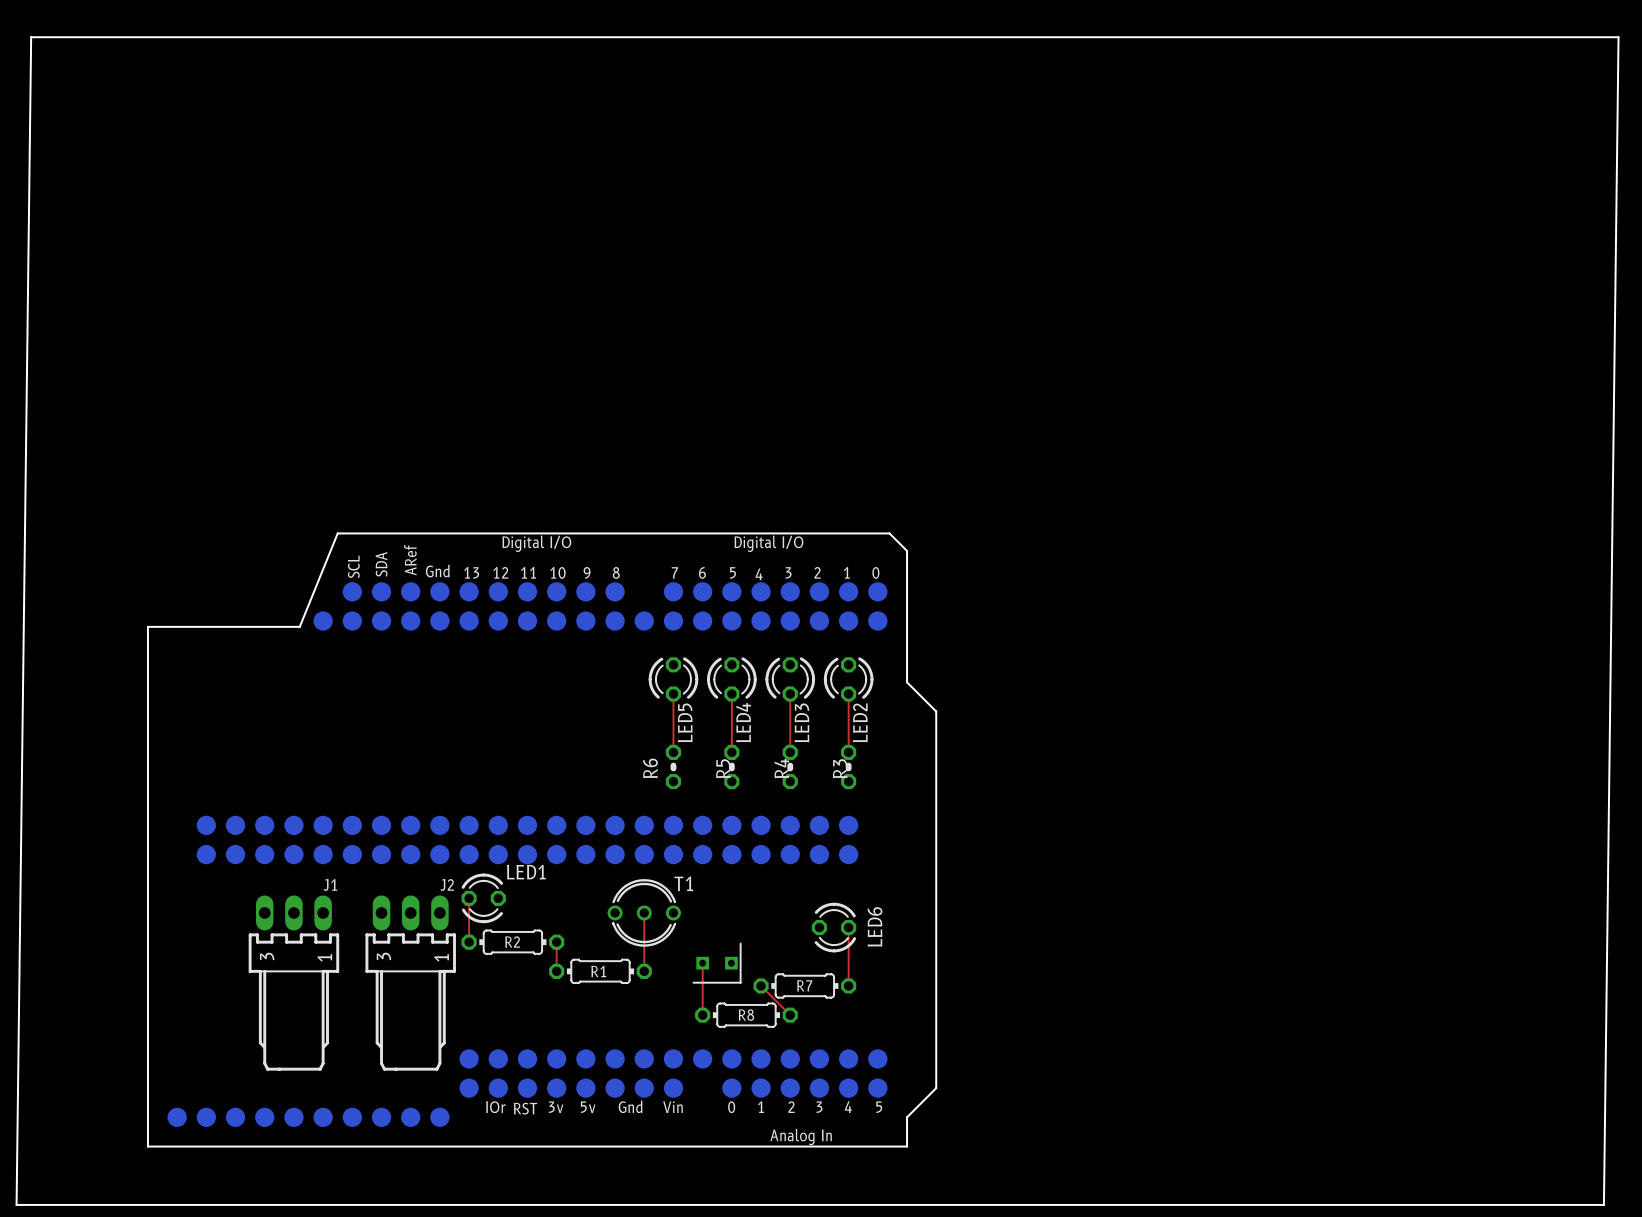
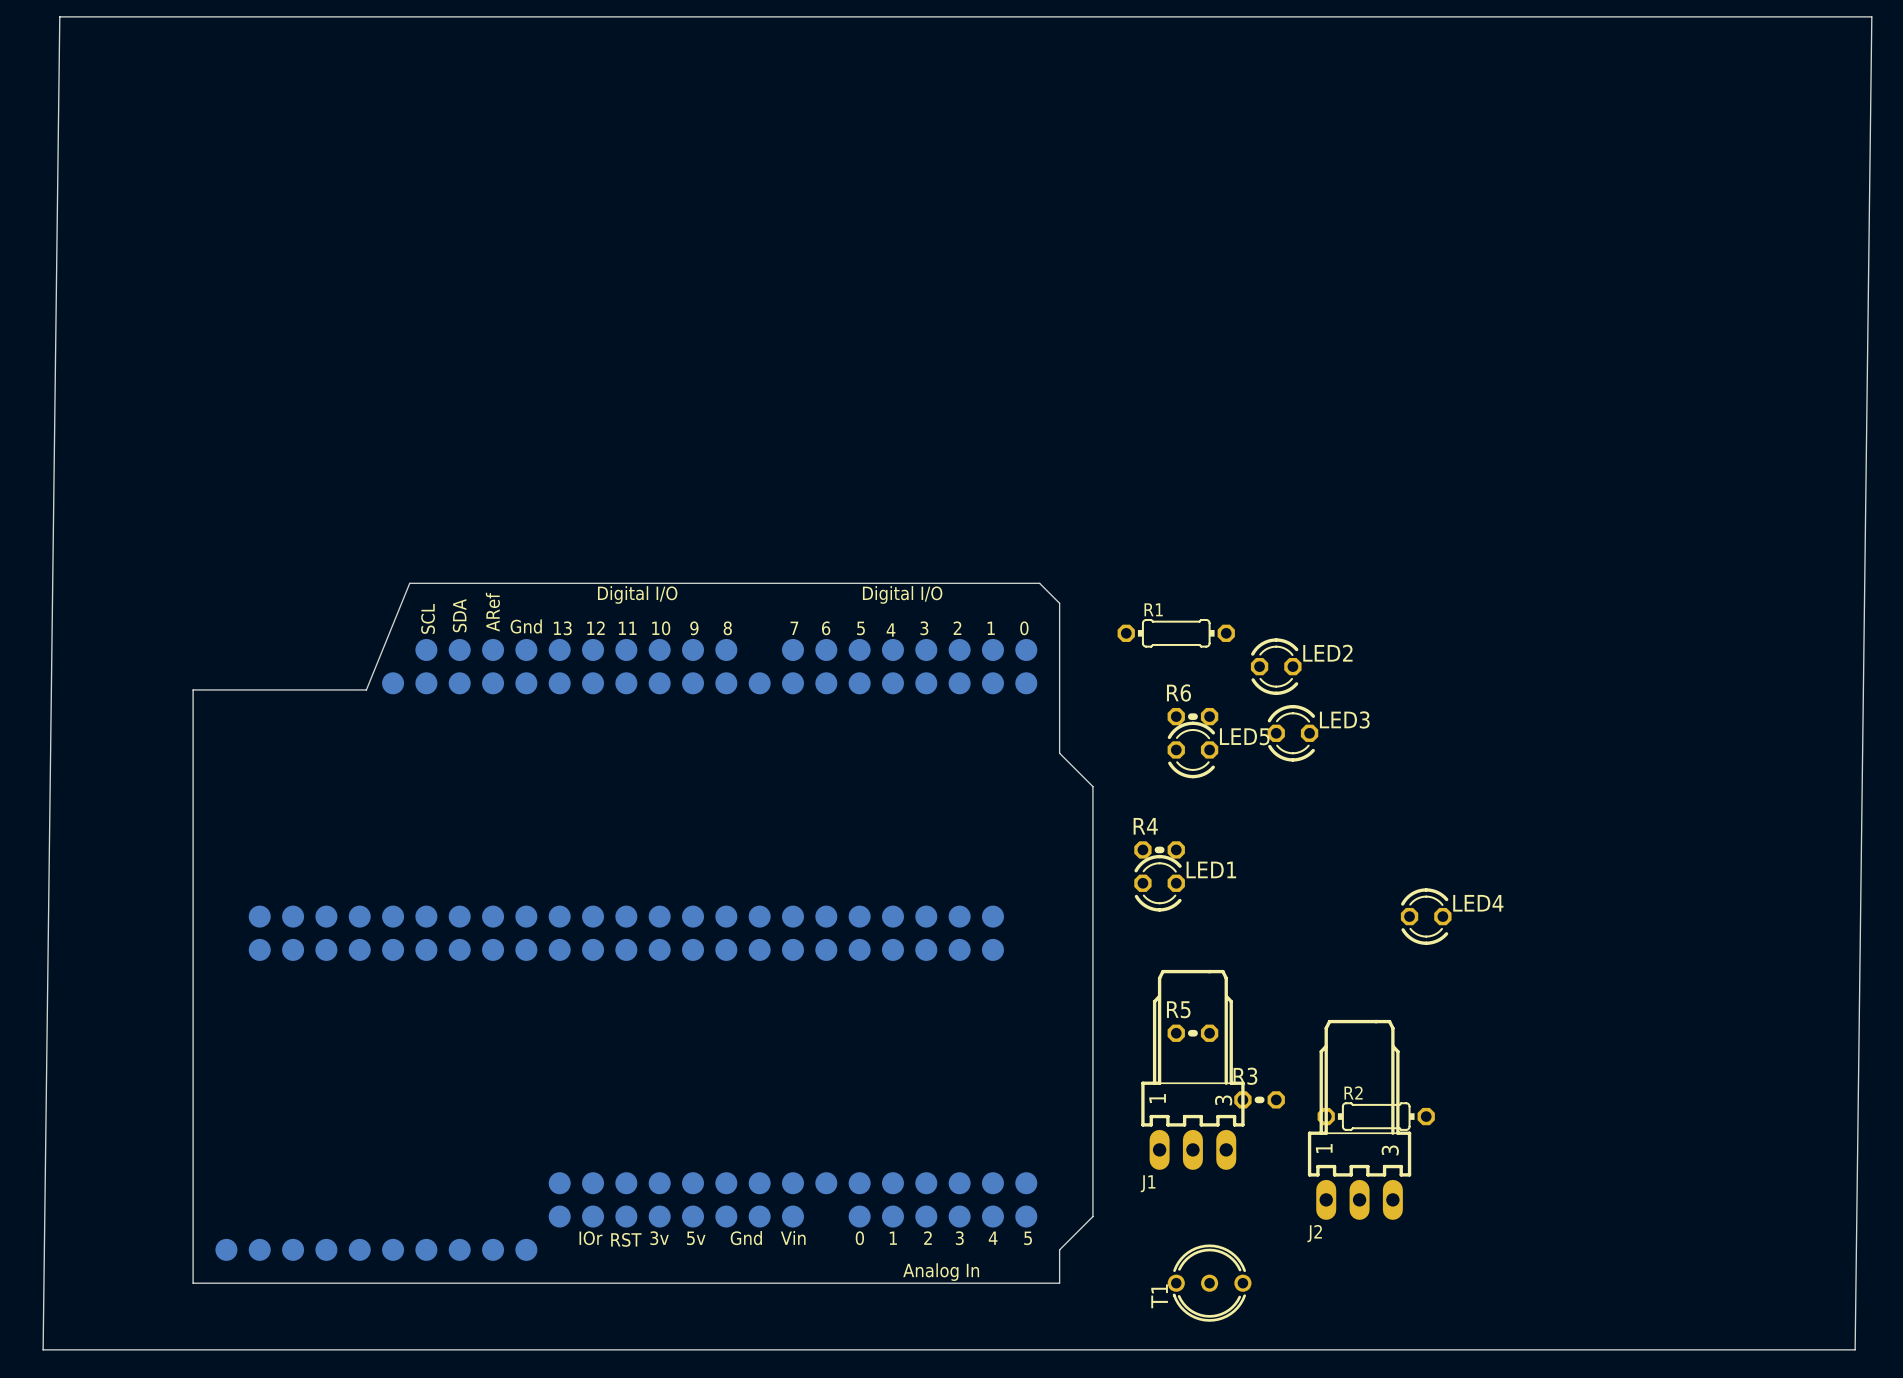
LED5 rotation: 0° (673, 679) -> 90° counterclockwise (1192, 749)
LED5 position: (673, 679) -> (1192, 749)
LED4 rotation: 0° (731, 679) -> 90° counterclockwise (1426, 916)
LED4 position: (731, 679) -> (1426, 916)
LED3 rotation: 0° (790, 679) -> 90° counterclockwise (1292, 733)
LED3 position: (790, 679) -> (1292, 733)
LED2 rotation: 0° (848, 679) -> 90° counterclockwise (1276, 666)
LED2 position: (848, 679) -> (1276, 666)
top track: (673, 694) (673, 752) -> none
top track: (731, 694) (731, 752) -> none
top track: (790, 694) (790, 752) -> none
top track: (848, 694) (848, 752) -> none
R6 rotation: 0° (673, 767) -> 90° clockwise (1192, 716)
R6 position: (673, 767) -> (1192, 716)
R5 rotation: 0° (731, 767) -> 90° clockwise (1192, 1033)
R5 position: (731, 767) -> (1192, 1033)
R4 rotation: 0° (790, 767) -> 90° clockwise (1159, 849)
R4 position: (790, 767) -> (1159, 849)
R3 rotation: 0° (848, 767) -> 90° clockwise (1259, 1099)
R3 position: (848, 767) -> (1259, 1099)
LED1 name position: LED1 (526, 872) -> LED1 (1211, 869)
T1 name rotation: 0° (683, 883) -> 90° counterclockwise (1159, 1296)
T1 name position: T1 (683, 883) -> T1 (1159, 1296)
J1 name position: J1 (330, 884) -> J1 (1148, 1183)
J2 name position: J2 (447, 884) -> J2 (1314, 1233)
J1 footprint: [248, 895, 340, 1071] -> [1141, 969, 1245, 1170]
J2 footprint: [365, 895, 456, 1071] -> [1307, 1019, 1412, 1220]
top track: (469, 898) (469, 942) -> none
LED1 position: (483, 898) -> (1159, 883)
top track: (644, 912) (644, 971) -> none
T1 position: (644, 912) -> (1209, 1283)
LED6: (834, 927) -> none
top track: (848, 927) (848, 985) -> none
R2 position: (512, 942) -> (1376, 1116)
R2 name position: R2 (512, 942) -> R2 (1353, 1092)
top track: (556, 942) (556, 971) -> none
top track: (702, 963) (702, 1015) -> none
part: (717, 963) -> none
R1 name position: R1 (598, 971) -> R1 (1153, 609)
R1 position: (600, 971) -> (1176, 633)
top track: (761, 985) (790, 1015) -> none
R7: (804, 985) -> none
R8: (746, 1015) -> none

